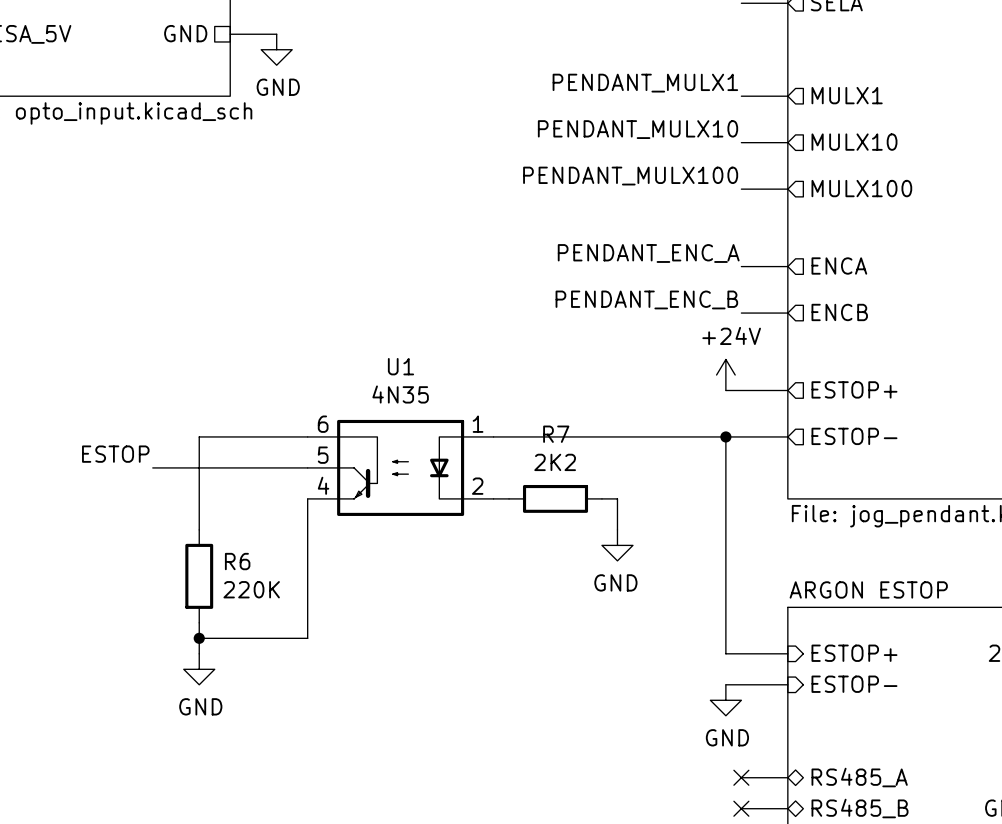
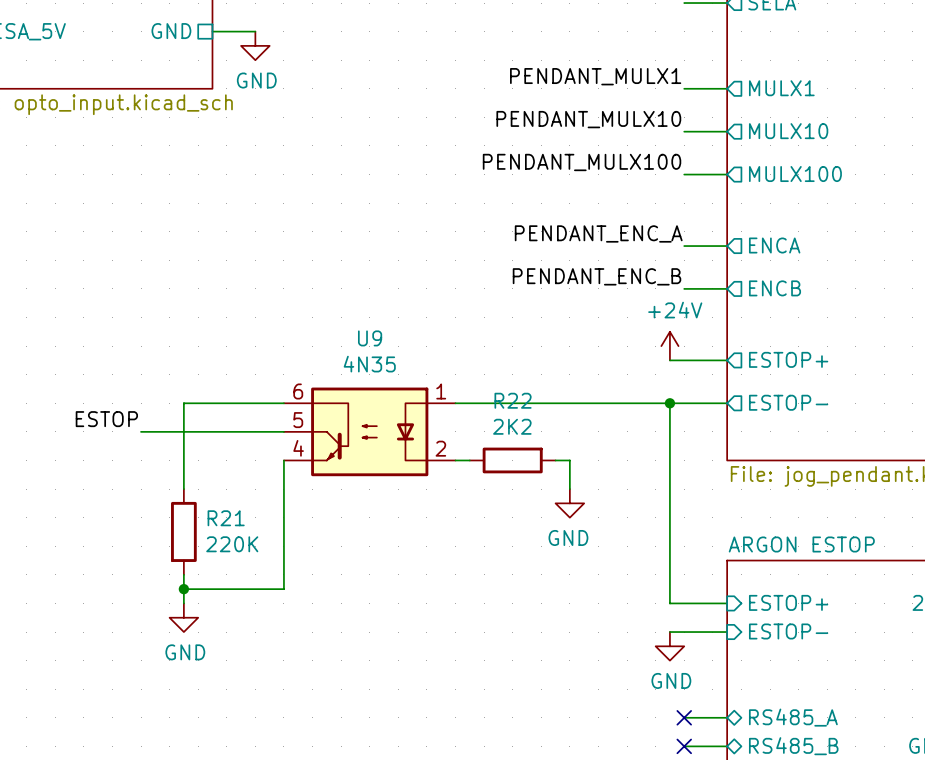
U1 name: U1 (400, 366) -> U9 (370, 338)
R7 name: R7 (556, 434) -> R22 (513, 400)
R6 name: R6 (237, 561) -> R21 (226, 518)

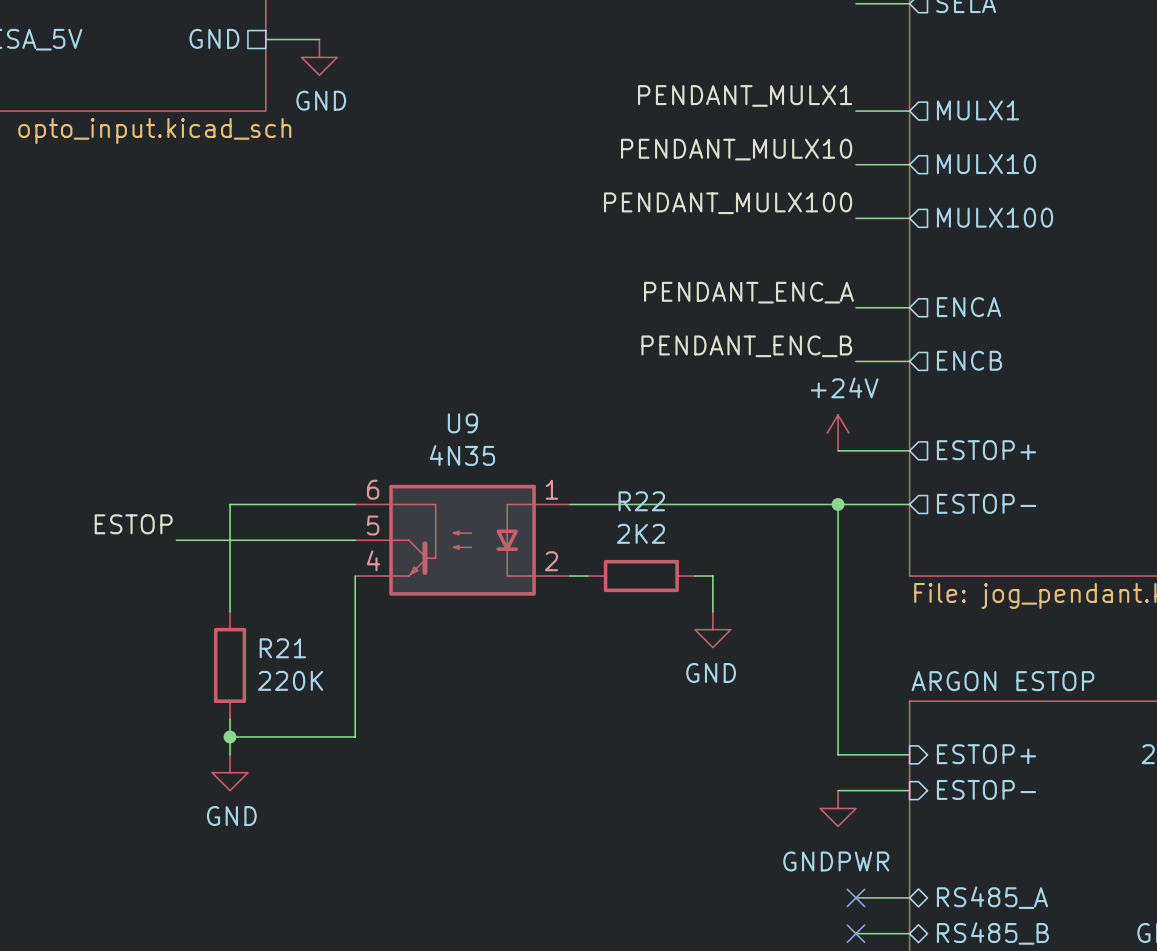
power symbol: GND (669, 646) -> GNDPWR (838, 808)

